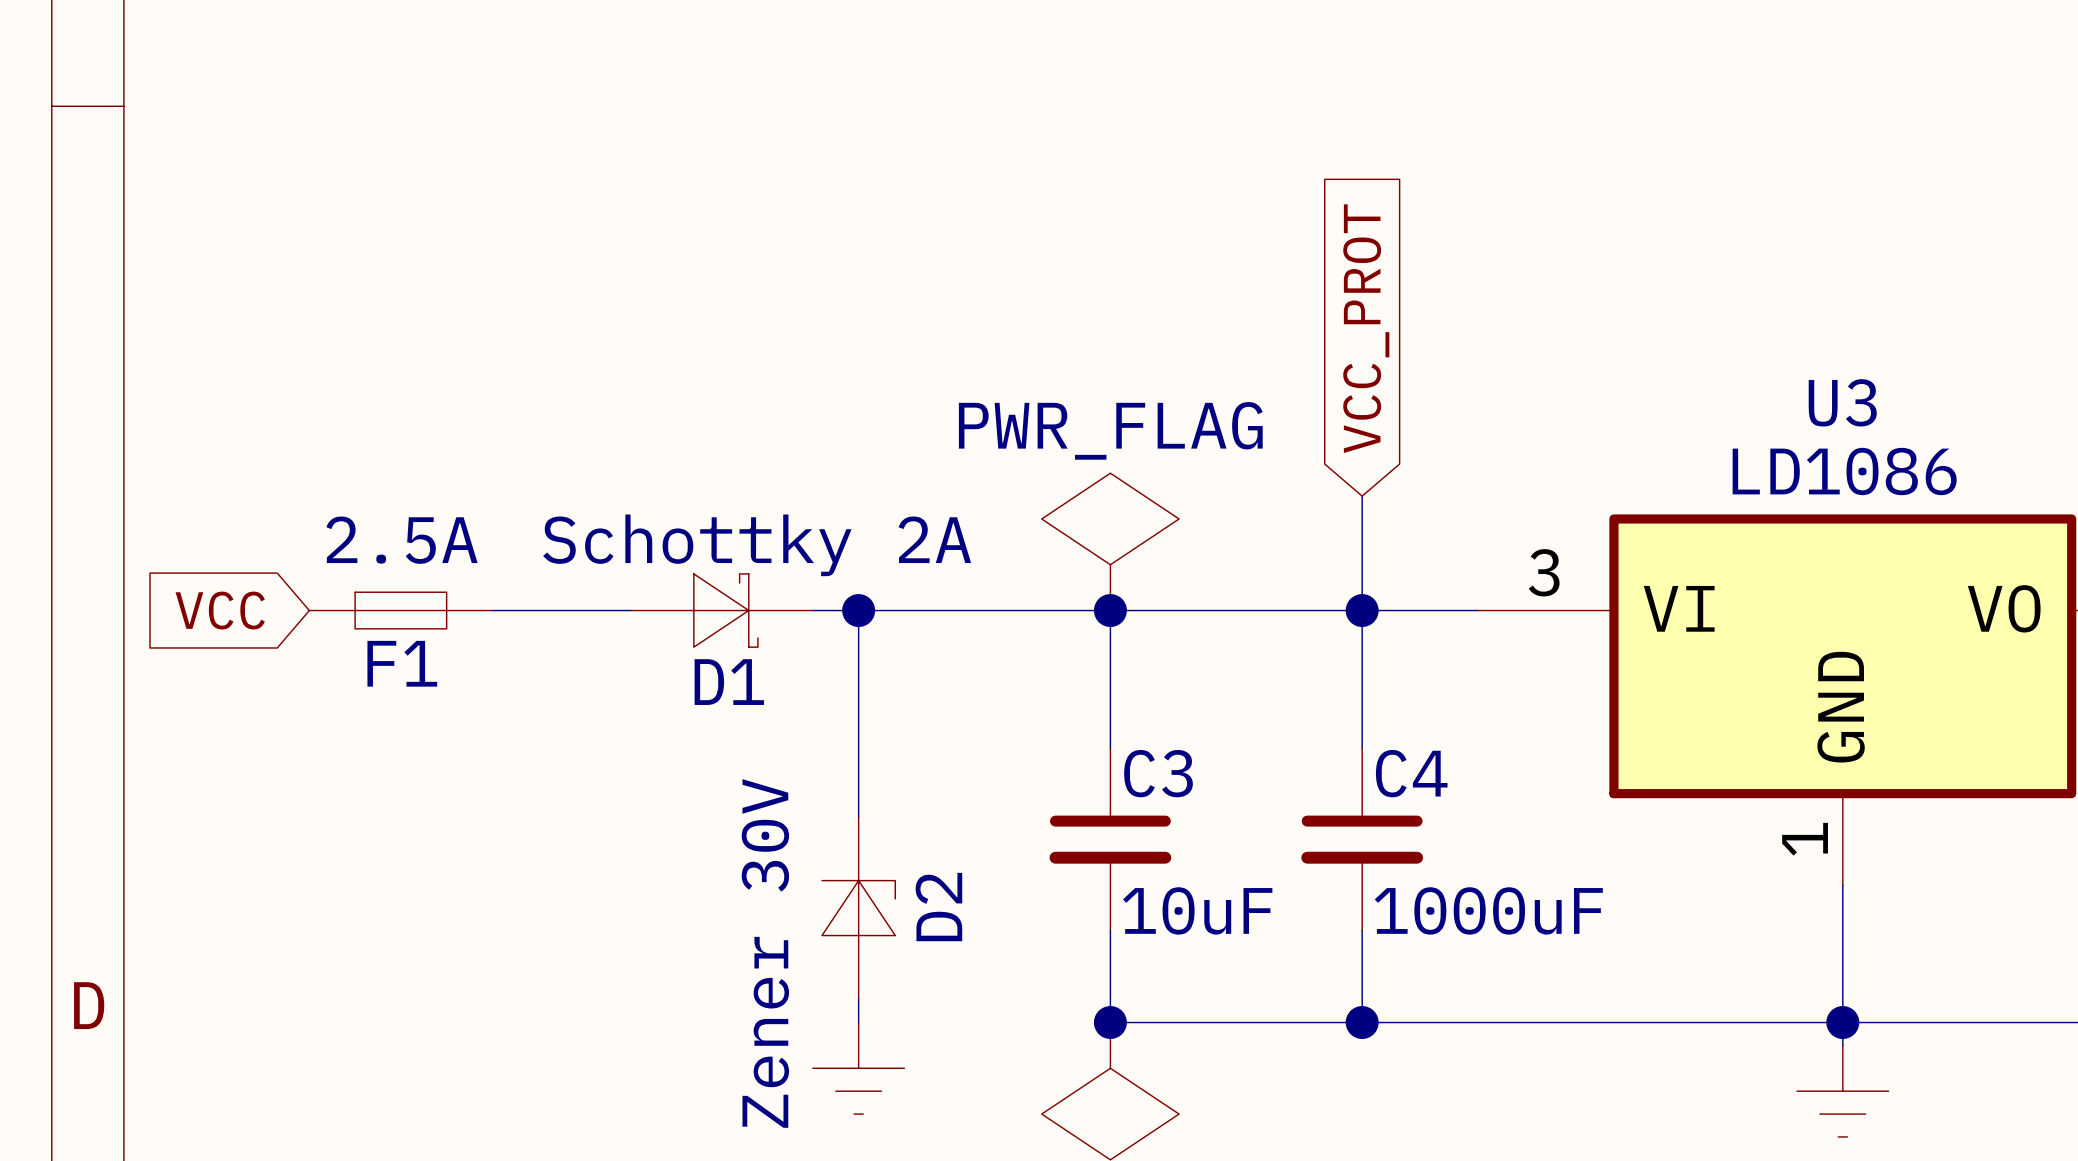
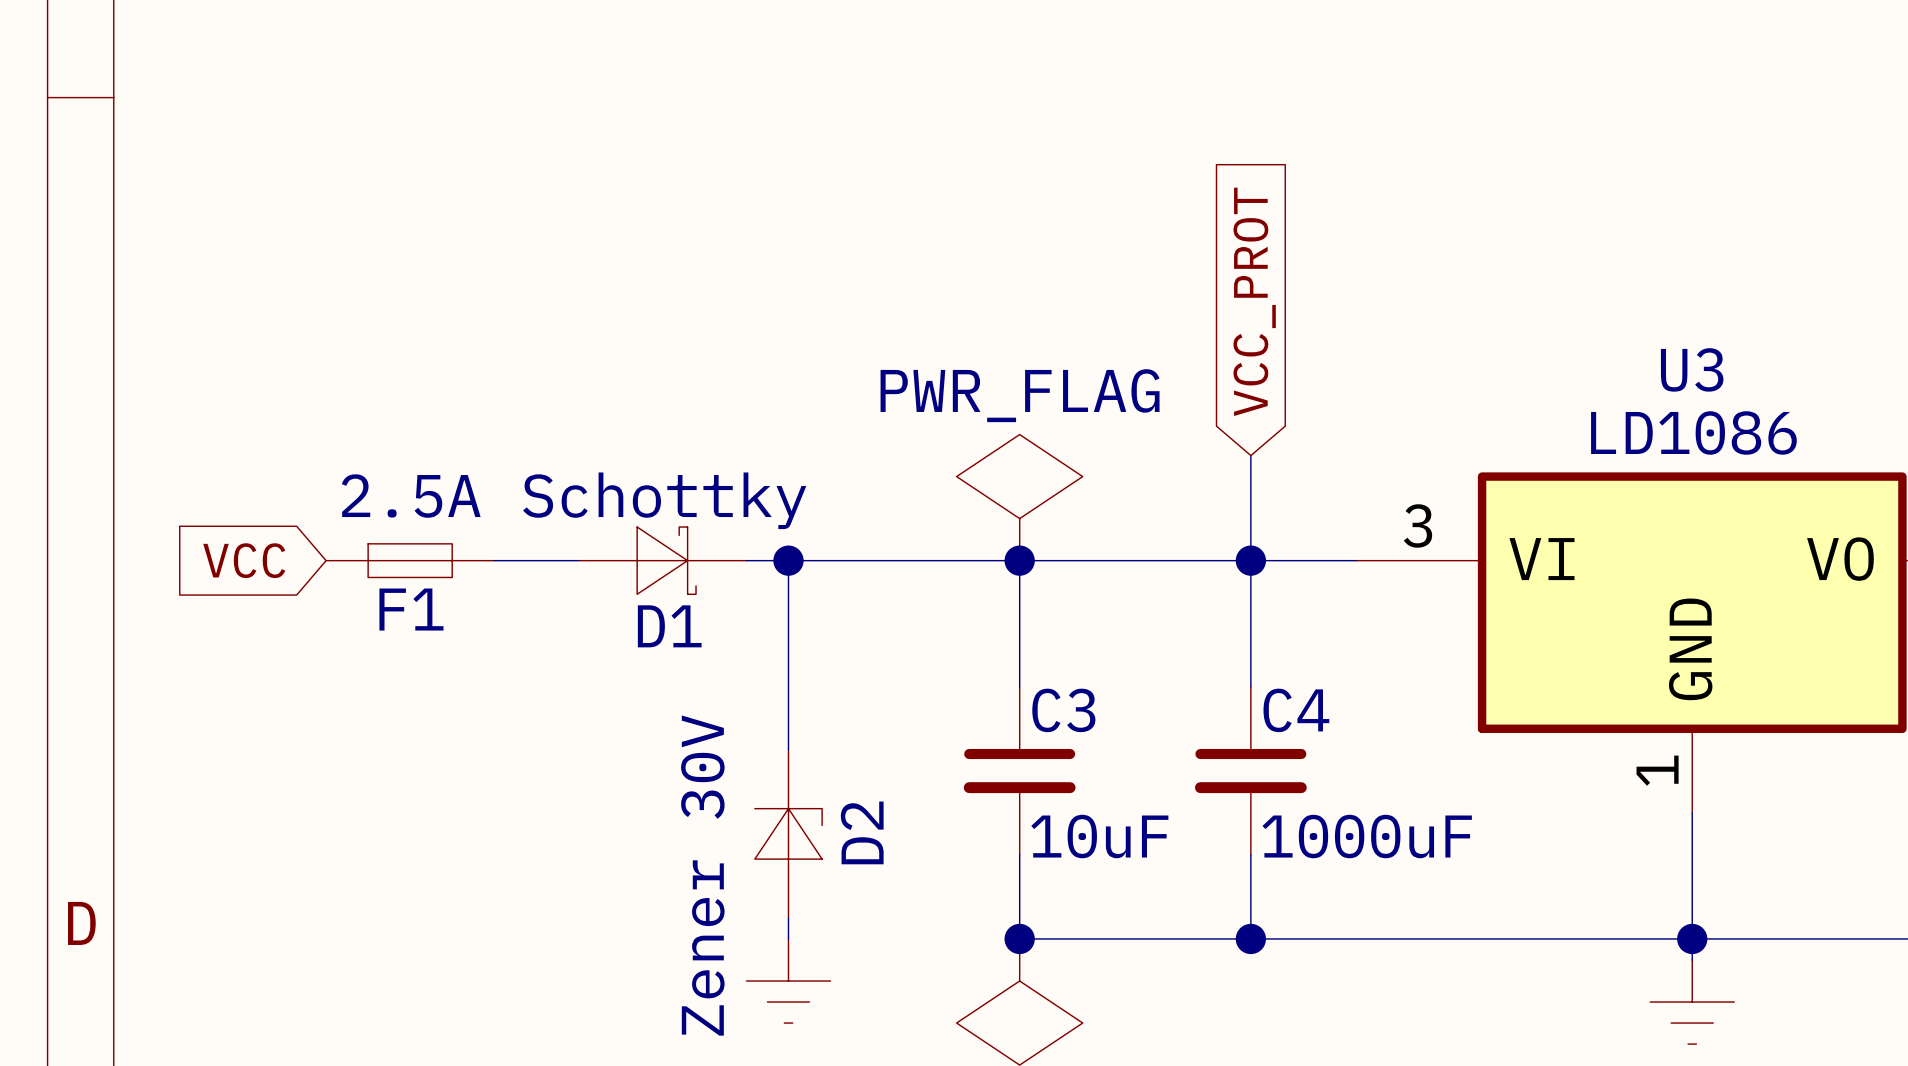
D1 value: Schottky 2A (757, 545) -> Schottky (664, 500)
global label position: VCC (220, 610) -> VCC (244, 560)
F1 position: (400, 610) -> (410, 560)

